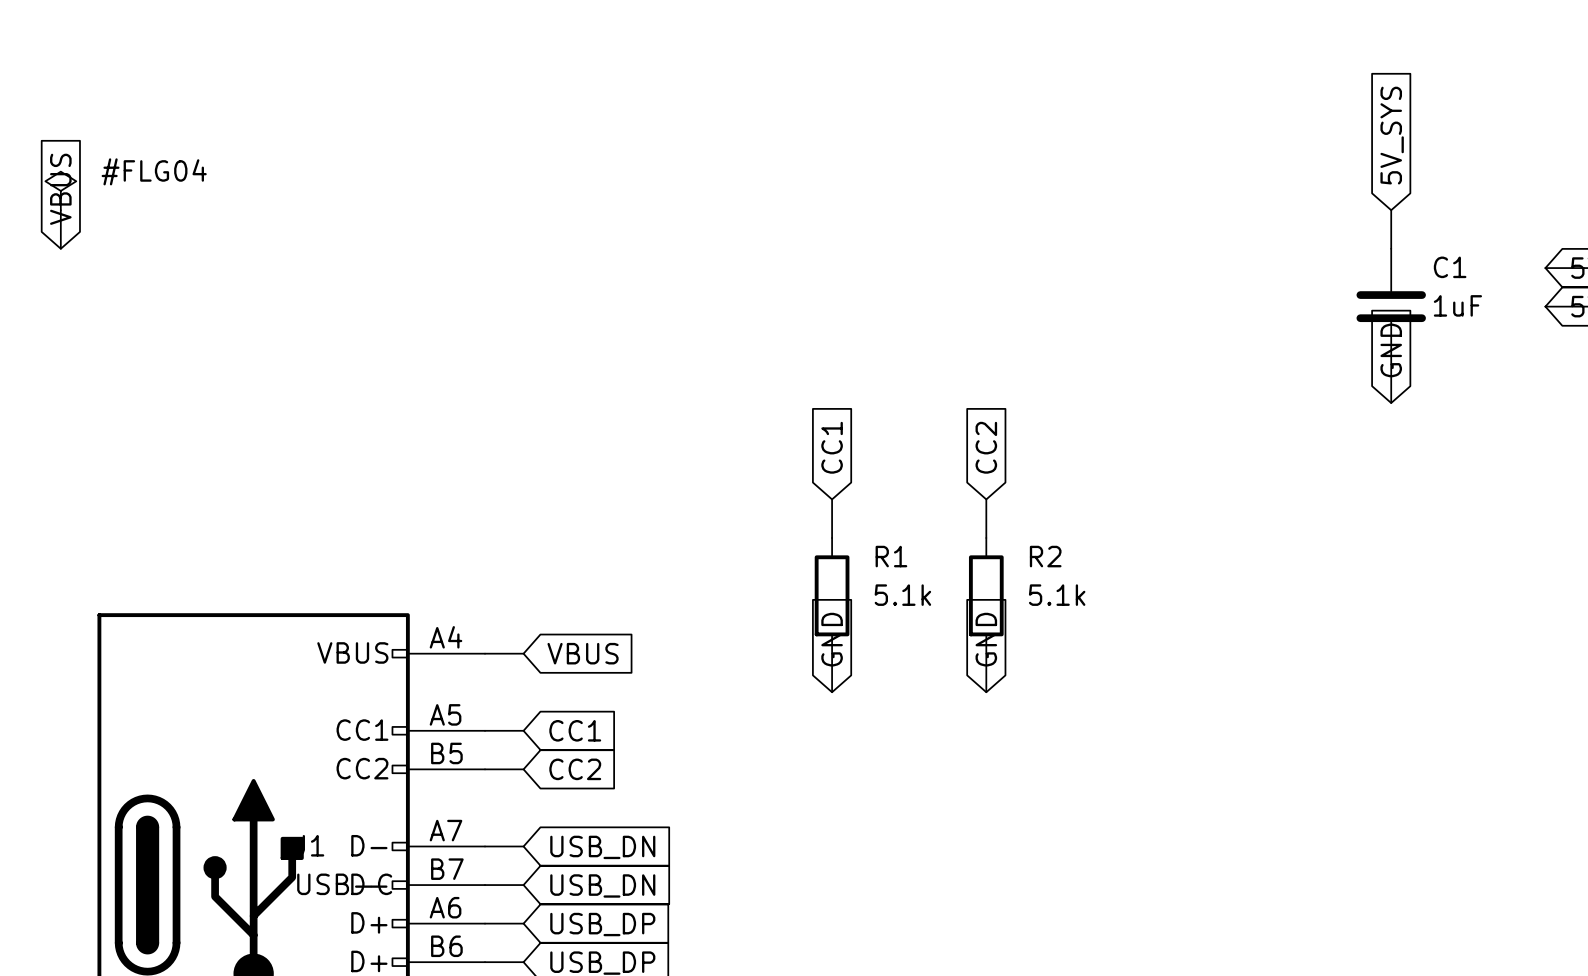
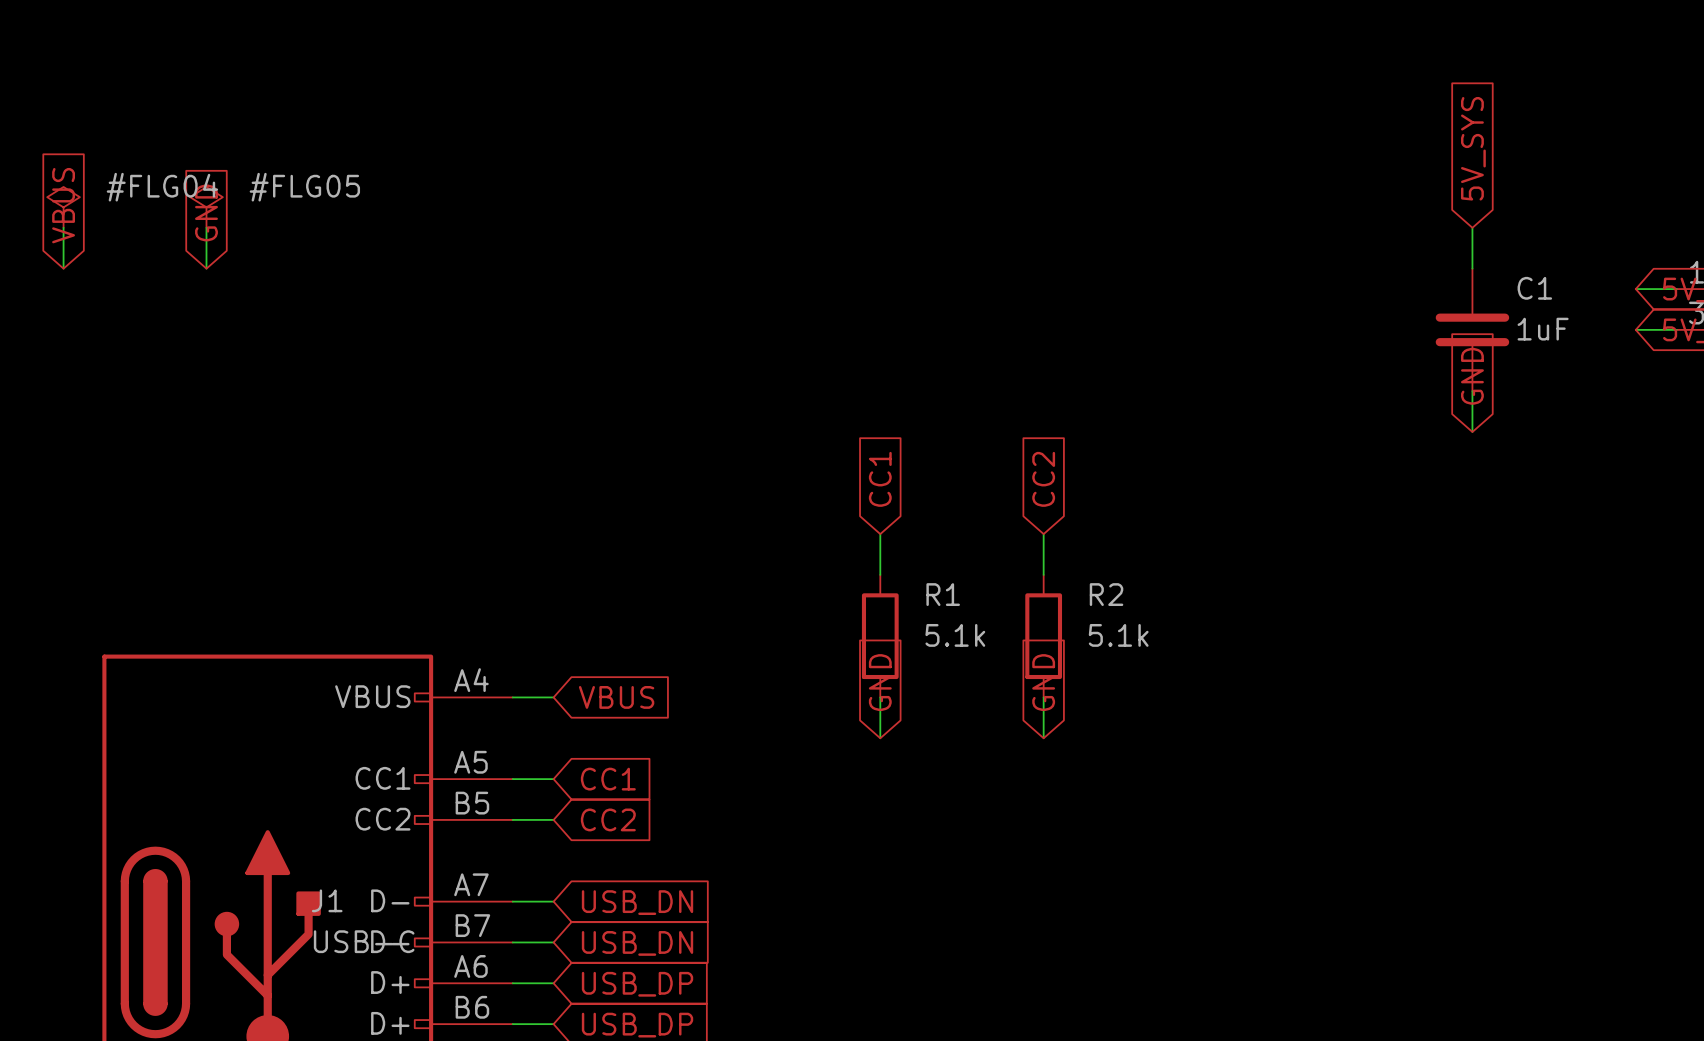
#FLG05: none -> (206, 207)
global label: none -> GND (206, 212)
wire: none -> (206, 227) (206, 268)

